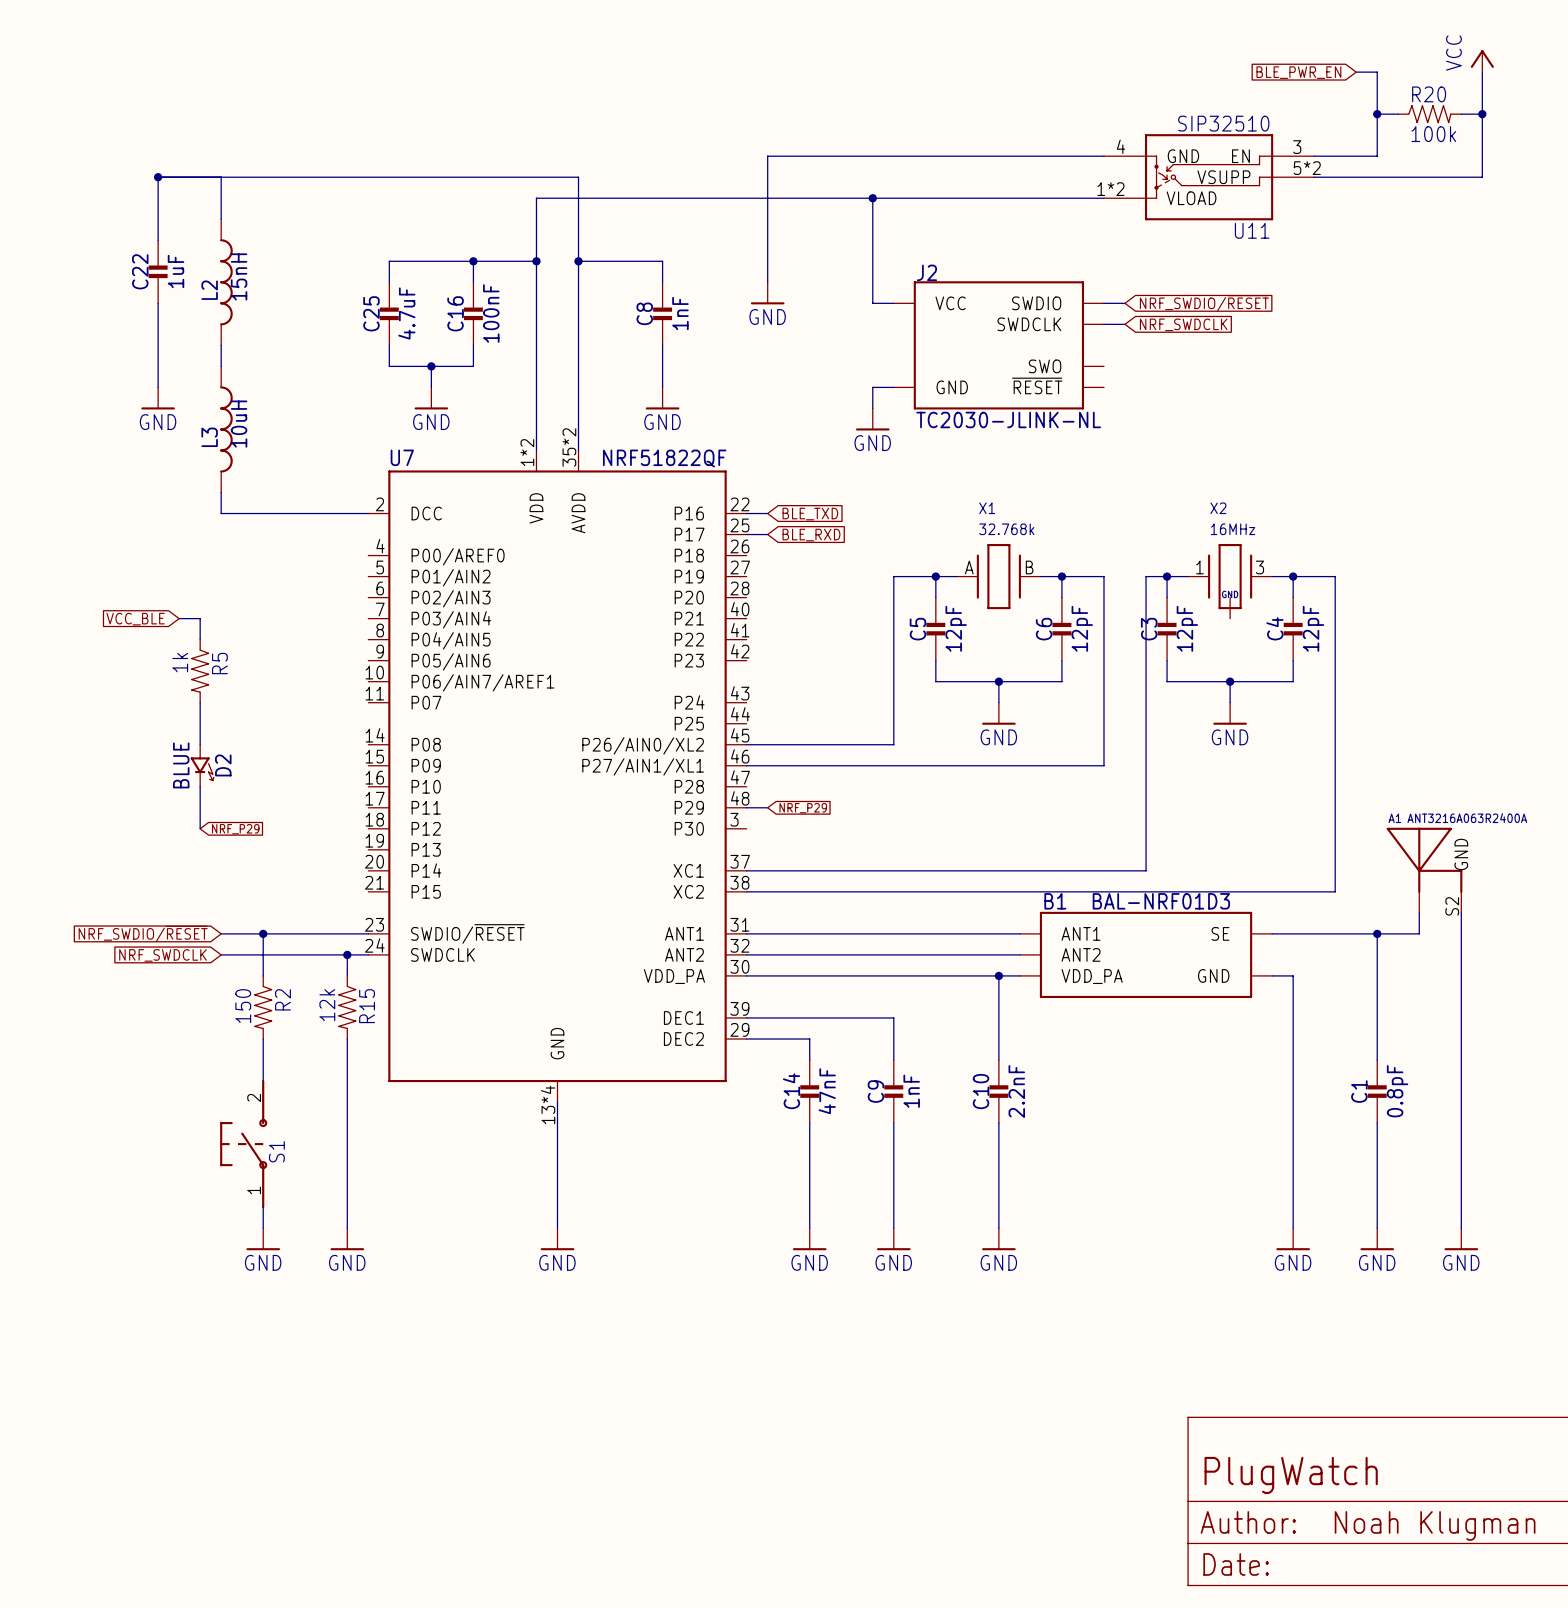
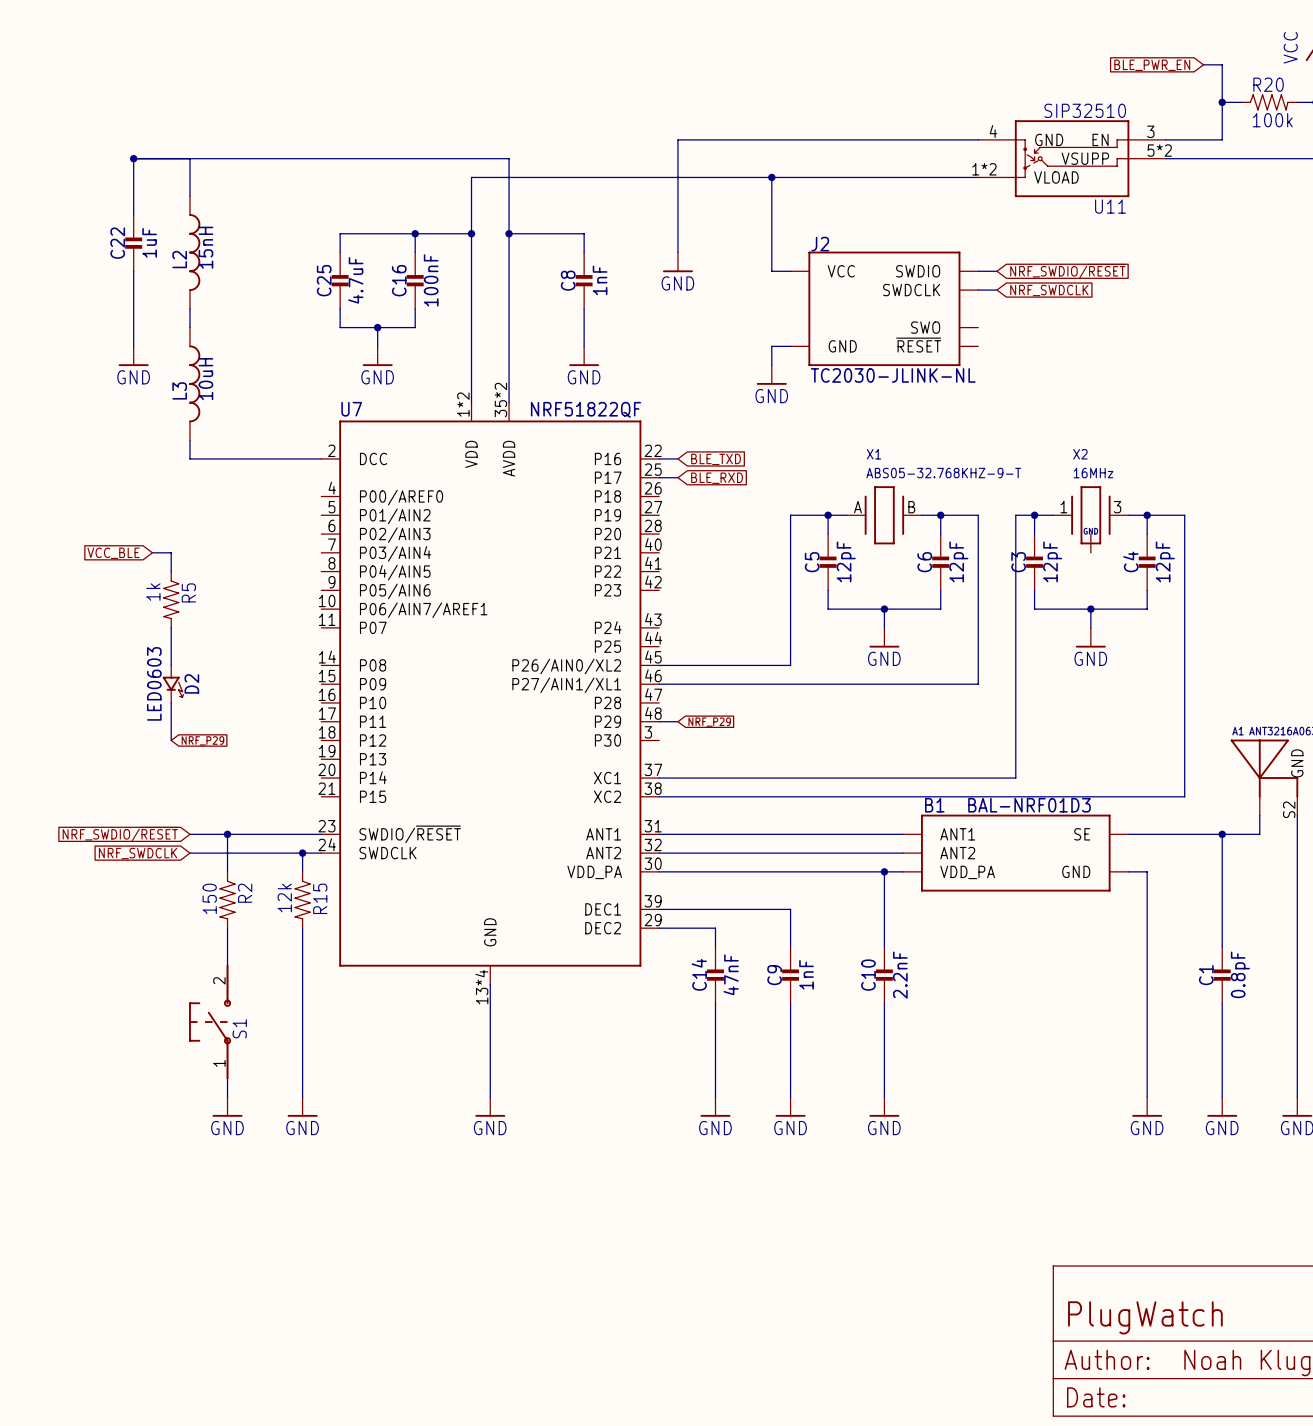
X1 value: 32.768k (1006, 529) -> ABS05-32.768KHZ-9-T (943, 473)
D2 value: BLUE (181, 765) -> LED0603 (154, 683)

